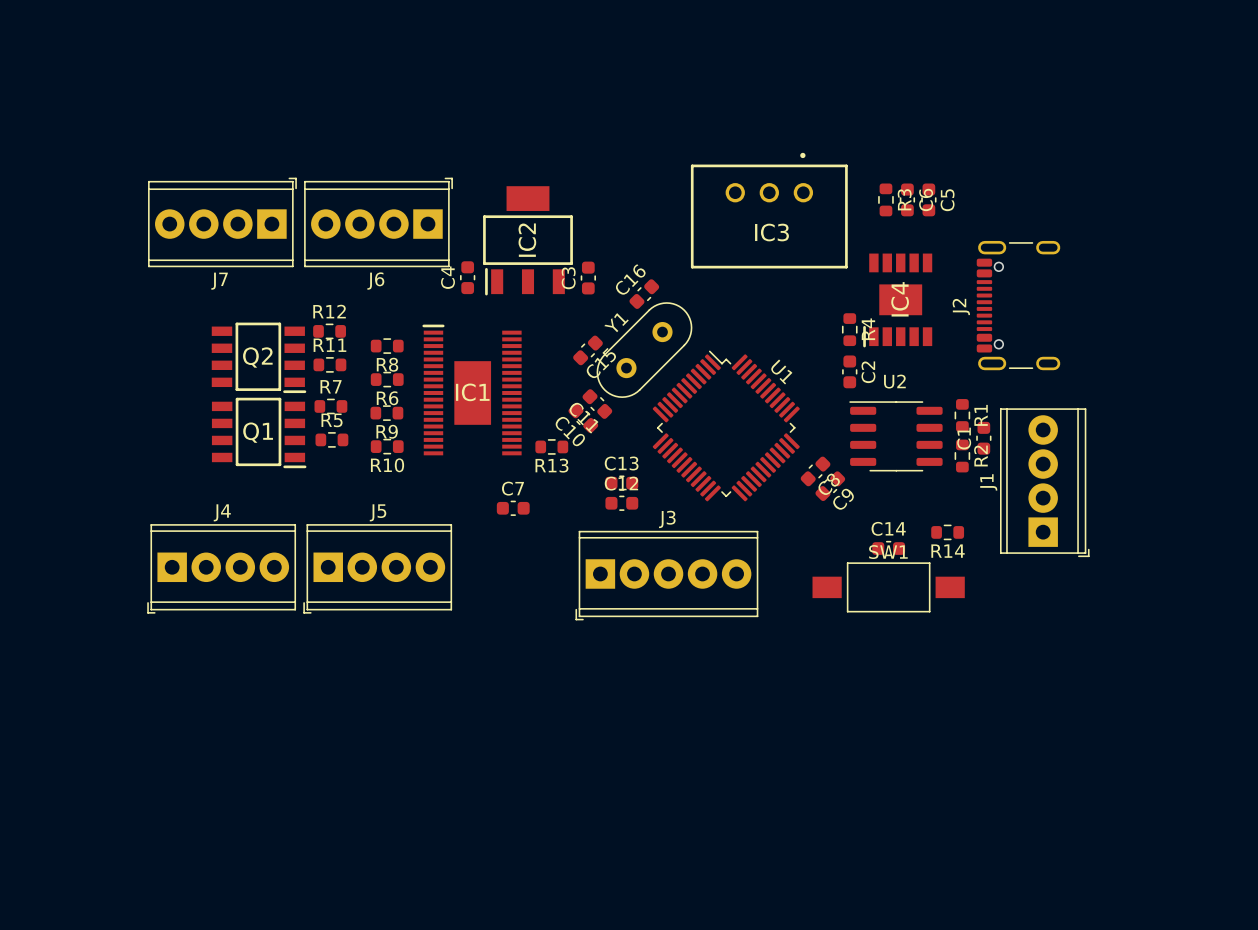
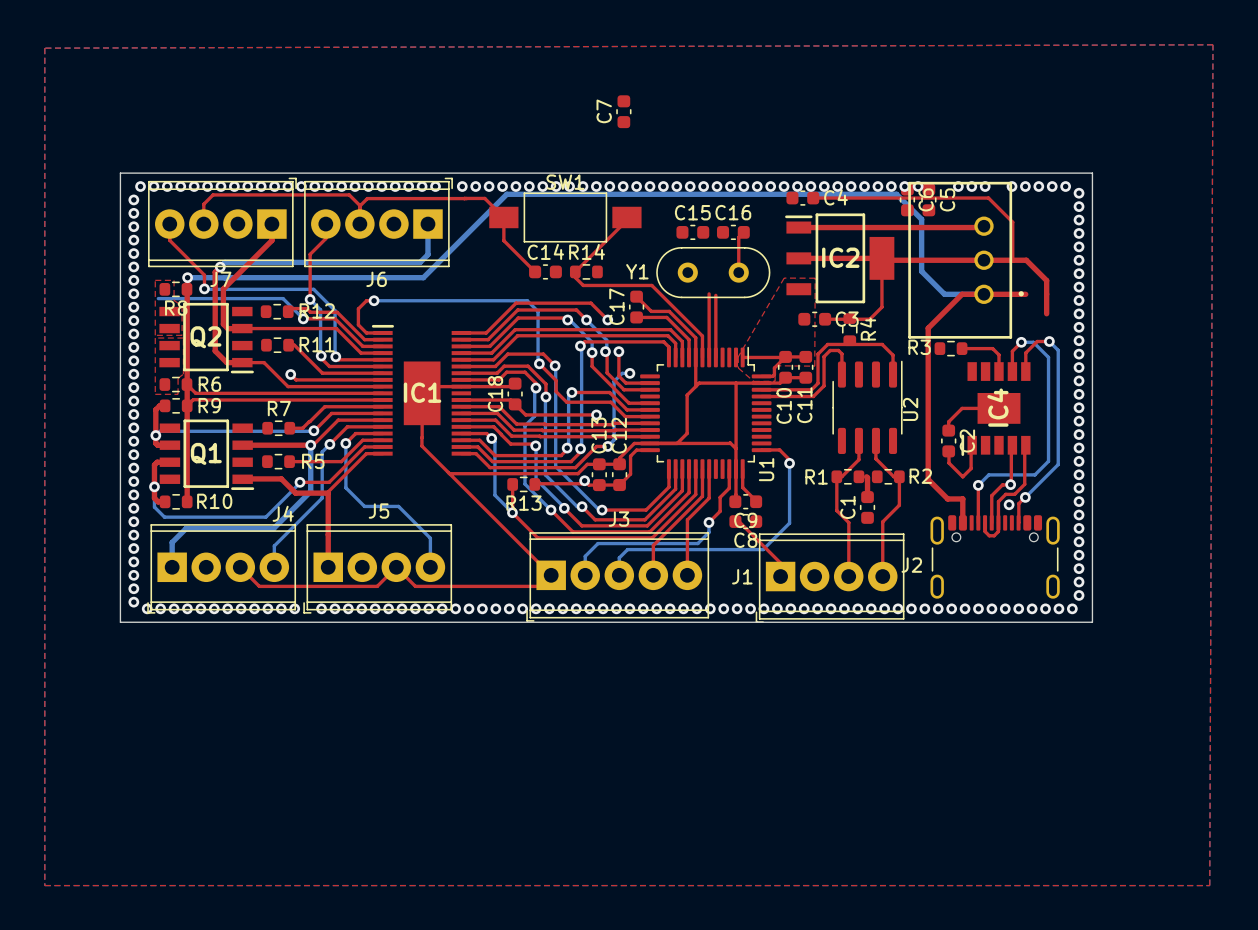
top zone outline: none -> (1212, 44) (1209, 885) (44, 885) (44, 48) (1212, 44)
board edge: none -> (120, 173) (1092, 173) (1092, 622) (120, 622) (120, 173)
via: none -> (140, 186)
via: none -> (153, 186)
via: none -> (167, 186)
via: none -> (180, 186)
via: none -> (194, 186)
via: none -> (207, 186)
via: none -> (220, 186)
via: none -> (234, 186)
via: none -> (247, 186)
via: none -> (261, 186)
via: none -> (274, 186)
via: none -> (288, 186)
via: none -> (301, 186)
via: none -> (314, 186)
via: none -> (328, 186)
via: none -> (341, 186)
via: none -> (355, 186)
via: none -> (368, 186)
via: none -> (381, 186)
via: none -> (395, 186)
via: none -> (408, 186)
via: none -> (422, 186)
via: none -> (435, 186)
via: none -> (462, 186)
via: none -> (475, 186)
via: none -> (489, 186)
via: none -> (502, 186)
via: none -> (515, 186)
via: none -> (529, 186)
via: none -> (542, 186)
via: none -> (556, 186)
via: none -> (569, 186)
via: none -> (582, 186)
via: none -> (596, 186)
via: none -> (609, 186)
via: none -> (623, 186)
via: none -> (636, 186)
via: none -> (650, 186)
via: none -> (663, 186)
via: none -> (676, 186)
via: none -> (690, 186)
via: none -> (703, 186)
via: none -> (717, 186)
via: none -> (730, 186)
via: none -> (743, 186)
via: none -> (757, 186)
via: none -> (770, 186)
via: none -> (784, 186)
via: none -> (797, 186)
via: none -> (810, 186)
via: none -> (824, 186)
via: none -> (837, 186)
via: none -> (851, 186)
via: none -> (864, 186)
via: none -> (877, 186)
via: none -> (891, 186)
via: none -> (904, 186)
via: none -> (918, 186)
via: none -> (958, 186)
via: none -> (971, 186)
via: none -> (985, 186)
via: none -> (1012, 186)
via: none -> (1025, 186)
via: none -> (1038, 186)
via: none -> (1052, 186)
via: none -> (1065, 186)
via: none -> (1079, 193)
top track: none -> (464, 198) (484, 198) (503, 217) (503, 240) (535, 271)
top track: none -> (466, 198) (367, 198) (359, 206)
top track: none -> (813, 198) (988, 198) (1012, 222) (1012, 260)
via: none -> (133, 199)
R3 rotation: 0° (885, 199) -> 90° clockwise (951, 348)
R3 position: (885, 199) -> (951, 348)
R3 name position: R3 (904, 199) -> R3 (919, 347)
via: none -> (1079, 206)
IC3: (769, 210) -> none
via: none -> (133, 213)
top track: none -> (626, 217) (626, 220) (575, 271) (575, 277) (583, 285) (651, 285) (702, 336) (702, 357)
via: none -> (1079, 220)
top track: none -> (169, 224) (169, 240) (204, 275) (204, 288)
top track: none -> (203, 224) (203, 204) (213, 194) (349, 194) (359, 205) (359, 224)
top track: none -> (271, 224) (271, 240) (223, 289) (223, 324) (227, 328) (236, 328)
top track: none -> (325, 224) (325, 238) (310, 254) (310, 299)
bottom track: none -> (427, 224) (427, 254) (420, 262) (225, 262) (220, 267)
via: none -> (133, 226)
top track: none -> (983, 226) (798, 227)
top track: none -> (743, 232) (738, 237) (738, 272)
via: none -> (1079, 233)
via: none -> (133, 240)
IC2 rotation: 0° (528, 240) -> 90° clockwise (839, 258)
IC2 position: (528, 240) -> (839, 258)
via: none -> (1079, 246)
via: none -> (133, 253)
top track: none -> (798, 258) (881, 258)
top track: none -> (881, 258) (881, 307) (869, 319) (825, 319)
top track: none -> (881, 258) (883, 260) (1026, 260) (1046, 280) (1046, 313)
part: none -> (966, 260)
via: none -> (1079, 260)
via: none -> (133, 266)
top track: none -> (220, 267) (215, 272) (215, 351) (226, 362) (264, 362) (288, 386) (382, 386)
via: none -> (220, 267)
via: none -> (1079, 273)
top track: none -> (187, 277) (187, 501)
bottom track: none -> (187, 277) (215, 277)
via: none -> (187, 277)
bottom track: none -> (215, 277) (224, 277)
bottom track: none -> (224, 277) (423, 277) (506, 194) (896, 194) (921, 219) (921, 271) (944, 294) (983, 294)
C4 name position: C4 (448, 277) -> C4 (836, 197)
C4 rotation: 0° (467, 277) -> 90° clockwise (802, 198)
C4 position: (467, 277) -> (802, 198)
C3 name position: C3 (568, 278) -> C3 (847, 319)
C3 rotation: 0° (588, 278) -> 90° clockwise (814, 319)
C3 position: (588, 278) -> (814, 319)
top zone outline: none -> (784, 278) (815, 278) (814, 366) (775, 365) (775, 381) (753, 381) (738, 368) (738, 356) (784, 278)
via: none -> (133, 280)
top zone outline: none -> (155, 280) (155, 335) (182, 335) (182, 305) (174, 300) (174, 280) (155, 280)
via: none -> (1079, 287)
bottom track: none -> (204, 288) (313, 289) (335, 310) (335, 356)
via: none -> (204, 288)
via: none -> (133, 293)
top track: none -> (709, 293) (709, 357)
C16 rotation: 0° (644, 294) -> 45° clockwise (733, 232)
C16 position: (644, 294) -> (733, 232)
top track: none -> (1025, 294) (962, 294) (928, 328) (928, 479) (947, 498) (962, 498) (962, 522)
top track: none -> (715, 295) (715, 357)
top track: none -> (636, 296) (651, 311) (669, 311) (695, 337) (695, 386)
bottom track: none -> (158, 298) (283, 298) (303, 318)
bottom track: none -> (310, 299) (320, 309) (321, 356)
via: none -> (310, 299)
top track: none -> (374, 300) (366, 300) (358, 308) (358, 324) (366, 332) (382, 332)
bottom track: none -> (374, 300) (527, 300) (538, 311) (539, 363)
via: none -> (374, 300)
IC4 position: (897, 300) -> (995, 409)
via: none -> (1079, 300)
J2 rotation: 0° (1018, 305) -> 90° clockwise (995, 556)
J2 position: (1018, 305) -> (995, 556)
via: none -> (133, 307)
C17: none -> (636, 307)
top track: none -> (288, 311) (291, 308) (306, 308) (310, 312) (337, 312) (364, 339) (382, 339)
R12 name position: R12 (329, 311) -> R12 (317, 310)
via: none -> (1079, 313)
top track: none -> (636, 317) (666, 317) (689, 339) (689, 357)
top track: none -> (303, 318) (335, 318) (362, 346) (382, 346)
via: none -> (303, 318)
top track: none -> (567, 319) (565, 318) (518, 318) (489, 346) (461, 346)
bottom track: none -> (567, 319) (592, 342) (592, 352)
via: none -> (567, 319)
top track: none -> (586, 319) (576, 310) (517, 310) (488, 339) (461, 339)
bottom track: none -> (586, 319) (606, 340) (605, 351)
via: none -> (586, 319)
top track: none -> (607, 319) (590, 303) (516, 303) (486, 332) (461, 332)
via: none -> (607, 319)
via: none -> (133, 320)
Y1 name position: Y1 (616, 322) -> Y1 (637, 271)
via: none -> (1079, 327)
top track: none -> (236, 328) (336, 328) (361, 353) (382, 353)
R12 position: (329, 331) -> (277, 311)
via: none -> (133, 334)
top zone outline: none -> (155, 338) (155, 394) (178, 394) (178, 378) (183, 374) (183, 338) (155, 338)
via: none -> (1079, 340)
top track: none -> (1049, 341) (1037, 341) (1025, 352) (1025, 371)
bottom track: none -> (1049, 341) (1058, 350) (1058, 464) (1025, 497)
via: none -> (1049, 341)
top track: none -> (1021, 342) (1012, 351) (1012, 371)
bottom track: none -> (1021, 342) (1033, 342) (1048, 357) (1048, 461) (1034, 474) (988, 474) (978, 485)
via: none -> (1021, 342)
top track: none -> (288, 345) (294, 345) (322, 373) (382, 373)
R11 name position: R11 (329, 345) -> R11 (317, 344)
R8 position: (387, 346) -> (175, 289)
top track: none -> (580, 346) (584, 341) (663, 341) (668, 347) (668, 357)
bottom track: none -> (580, 346) (580, 448)
via: none -> (580, 346)
via: none -> (133, 347)
top track: none -> (962, 348) (992, 348) (998, 354) (998, 371)
C15 rotation: 0° (587, 350) -> 45° clockwise (692, 232)
C15 position: (587, 350) -> (692, 232)
Y1 rotation: 0° (644, 350) -> 45° clockwise (713, 272)
Y1 position: (644, 350) -> (713, 272)
top track: none -> (605, 351) (607, 372) (624, 389) (650, 389)
via: none -> (605, 351)
top track: none -> (618, 351) (618, 376) (625, 383) (650, 383)
via: none -> (618, 351)
top track: none -> (592, 352) (592, 366) (628, 403) (650, 403)
via: none -> (592, 352)
top track: none -> (461, 353) (491, 353) (515, 329) (670, 329) (682, 341) (682, 357)
via: none -> (1079, 354)
top track: none -> (321, 356) (329, 366) (382, 366)
via: none -> (321, 356)
top track: none -> (335, 356) (338, 359) (382, 359)
via: none -> (335, 356)
top track: none -> (805, 356) (785, 356) (774, 368) (772, 376) (761, 376)
Q2 position: (259, 357) -> (206, 338)
top track: none -> (675, 357) (675, 343) (668, 335) (517, 335) (493, 359) (461, 359)
top track: none -> (742, 357) (785, 357)
via: none -> (133, 360)
top track: none -> (539, 363) (556, 380) (556, 391) (566, 402) (610, 402) (625, 416) (650, 416)
via: none -> (539, 363)
C15 name position: C15 (601, 363) -> C15 (692, 212)
R11 position: (329, 364) -> (277, 345)
top track: none -> (555, 365) (543, 354) (507, 354) (495, 366) (461, 366)
bottom track: none -> (555, 365) (555, 466) (599, 510) (602, 510)
via: none -> (555, 365)
top track: none -> (841, 365) (841, 353) (838, 350) (830, 350) (824, 356) (824, 385) (813, 396) (761, 396)
top track: none -> (893, 365) (893, 355) (882, 344) (827, 344) (818, 354) (818, 383) (811, 389) (761, 389)
via: none -> (1079, 367)
U1 name position: U1 (781, 371) -> U1 (766, 469)
C2 position: (849, 371) -> (948, 440)
top track: none -> (461, 373) (497, 373) (504, 366) (528, 366) (545, 384) (545, 397)
bottom track: none -> (629, 373) (622, 373) (614, 381) (614, 440) (607, 446)
via: none -> (629, 373)
via: none -> (133, 374)
top track: none -> (290, 374) (296, 379) (382, 379)
via: none -> (290, 374)
top track: none -> (805, 377) (785, 377) (780, 383) (699, 383) (687, 395) (687, 433) (677, 443)
R6 position: (387, 379) -> (175, 384)
top track: none -> (461, 379) (499, 379) (506, 372) (524, 372) (536, 383) (536, 388)
via: none -> (1079, 380)
top track: none -> (515, 383) (512, 386) (428, 386) (422, 393) (421, 446) (551, 575) (540, 586) (415, 586) (396, 567) (377, 586) (259, 586) (240, 567)
top track: none -> (736, 383) (736, 448)
top track: none -> (186, 384) (195, 393) (382, 393)
via: none -> (133, 387)
bottom track: none -> (536, 388) (534, 416) (524, 425) (524, 484) (550, 510)
via: none -> (536, 388)
IC1 position: (472, 389) -> (421, 390)
top track: none -> (571, 392) (609, 392) (627, 409) (650, 409)
bottom track: none -> (571, 392) (568, 395) (567, 448)
via: none -> (571, 392)
C18: none -> (515, 393)
via: none -> (1079, 394)
bottom track: none -> (545, 397) (545, 474) (577, 506) (582, 506)
via: none -> (545, 397)
R6 name position: R6 (387, 398) -> R6 (209, 384)
top track: none -> (382, 400) (193, 399) (187, 405)
top track: none -> (461, 400) (510, 400) (525, 414) (596, 414)
via: none -> (133, 401)
C11 rotation: 0° (597, 404) -> 45° clockwise (805, 367)
C11 position: (597, 404) -> (805, 367)
top track: none -> (165, 405) (159, 405) (155, 409) (155, 443) (157, 445) (169, 445)
R7 position: (330, 406) -> (278, 428)
top track: none -> (382, 406) (324, 406) (302, 428) (289, 428)
top track: none -> (461, 406) (499, 406) (516, 424) (650, 423)
via: none -> (1079, 407)
top track: none -> (382, 413) (331, 413) (313, 430)
R9 position: (386, 413) -> (176, 405)
top track: none -> (461, 413) (497, 413) (514, 430) (650, 430)
via: none -> (133, 414)
via: none -> (596, 414)
R1 rotation: 0° (962, 415) -> 90° clockwise (888, 476)
R1 position: (962, 415) -> (888, 476)
R1 name position: R1 (981, 415) -> R1 (816, 476)
top track: none -> (997, 416) (989, 408) (962, 408) (948, 421) (948, 430)
C10 rotation: 0° (583, 418) -> 45° clockwise (785, 367)
C10 position: (583, 418) -> (785, 367)
C11 name position: C11 (584, 418) -> C11 (804, 405)
R5 name position: R5 (332, 420) -> R5 (313, 461)
top track: none -> (382, 420) (338, 420) (313, 445) (242, 445)
top track: none -> (461, 420) (495, 420) (511, 436) (650, 436)
via: none -> (1079, 421)
U1 rotation: 0° (726, 425) -> 45° clockwise (705, 412)
top track: none -> (382, 426) (347, 426) (329, 444)
top track: none -> (461, 426) (493, 426) (510, 444) (533, 444) (535, 445)
via: none -> (133, 427)
bottom track: none -> (313, 430) (159, 431) (155, 435)
via: none -> (313, 430)
R9 name position: R9 (387, 431) -> R9 (209, 405)
C10 name position: C10 (570, 431) -> C10 (784, 405)
top track: none -> (858, 431) (858, 459) (841, 476) (836, 476) (836, 510) (848, 522) (848, 576)
Q1 position: (259, 432) -> (206, 454)
top track: none -> (382, 433) (355, 433) (345, 443)
top track: none -> (461, 433) (486, 433) (491, 438)
via: none -> (1079, 434)
via: none -> (155, 435)
U2 rotation: 0° (895, 436) -> 90° clockwise (867, 407)
bottom track: none -> (491, 438) (494, 441) (494, 495) (512, 512)
via: none -> (491, 438)
C1 position: (983, 438) -> (867, 507)
R5 position: (331, 439) -> (278, 461)
top track: none -> (382, 440) (362, 440) (341, 461) (289, 461)
top track: none -> (461, 440) (479, 440) (495, 455) (561, 455) (567, 448)
via: none -> (133, 441)
bottom track: none -> (345, 443) (345, 487) (364, 506) (398, 506) (430, 538) (430, 567)
via: none -> (345, 443)
bottom track: none -> (329, 444) (322, 452) (322, 498) (274, 545) (274, 567)
via: none -> (329, 444)
via: none -> (310, 445)
bottom track: none -> (535, 445) (536, 479) (564, 508)
via: none -> (535, 445)
top track: none -> (1025, 445) (1024, 484) (1014, 494) (1005, 494) (998, 501) (998, 531) (994, 535) (989, 535) (985, 531) (985, 522)
bottom track: none -> (312, 446) (310, 445) (310, 491) (273, 528) (186, 528) (172, 542) (172, 567)
top track: none -> (382, 446) (364, 446) (329, 482) (299, 482)
R10 position: (387, 446) -> (176, 501)
top track: none -> (461, 446) (477, 446) (492, 461) (571, 461) (580, 452) (580, 448)
R13 position: (551, 446) -> (523, 484)
top track: none -> (607, 446) (596, 446) (575, 467) (490, 467) (476, 453) (461, 453)
via: none -> (607, 446)
via: none -> (1079, 447)
via: none -> (567, 448)
via: none -> (580, 448)
top track: none -> (761, 449) (779, 449) (789, 459) (789, 463)
top track: none -> (875, 449) (875, 458) (893, 476) (899, 476) (899, 505) (882, 521) (882, 576)
top track: none -> (650, 450) (636, 450) (630, 456) (630, 474) (619, 485) (588, 485) (584, 480) (581, 483) (538, 483)
top track: none -> (382, 453) (366, 453) (328, 491) (328, 534)
top track: none -> (971, 453) (971, 468) (962, 476) (948, 463) (948, 457)
top track: none -> (1011, 453) (1011, 483) (1002, 484) (991, 495) (991, 522)
via: none -> (133, 454)
R2 rotation: 0° (962, 456) -> 90° clockwise (847, 476)
R2 position: (962, 456) -> (847, 476)
R2 name position: R2 (980, 456) -> R2 (920, 476)
via: none -> (1079, 461)
top track: none -> (169, 462) (157, 462) (154, 464) (154, 498) (158, 501) (165, 501)
bottom track: none -> (789, 463) (789, 523) (763, 549) (627, 549) (619, 557) (619, 575)
via: none -> (789, 463)
R10 name position: R10 (387, 465) -> R10 (214, 501)
via: none -> (133, 468)
top track: none -> (668, 469) (668, 487) (646, 510) (602, 510)
top track: none -> (675, 469) (675, 489) (644, 519) (595, 519) (582, 506)
top track: none -> (682, 469) (682, 490) (647, 525) (581, 525) (564, 508)
top track: none -> (689, 469) (689, 492) (649, 531) (572, 531) (551, 510)
top track: none -> (695, 469) (695, 494) (652, 537) (537, 537) (512, 512)
top track: none -> (702, 469) (702, 496) (653, 545) (653, 575)
top track: none -> (709, 469) (709, 498) (687, 519) (687, 575)
top track: none -> (729, 469) (729, 488) (720, 497) (720, 511) (709, 522)
top track: none -> (742, 469) (742, 487) (756, 501)
C8 rotation: 0° (815, 471) -> 45° clockwise (745, 521)
C8 position: (815, 471) -> (745, 521)
top track: none -> (449, 473) (577, 473) (587, 464) (619, 464) (619, 458) (634, 443) (730, 442) (735, 448) (735, 495)
via: none -> (1079, 474)
top track: none -> (866, 476) (867, 497)
top track: none -> (242, 479) (281, 478) (295, 493) (328, 493) (328, 567)
via: none -> (584, 480)
via: none -> (133, 481)
bottom track: none -> (299, 482) (265, 517) (164, 517) (154, 507) (154, 486)
via: none -> (299, 482)
J1 name position: J1 (988, 482) -> J1 (742, 576)
J1 rotation: 0° (1044, 482) -> 90° clockwise (830, 578)
J1 position: (1044, 482) -> (830, 578)
C13 rotation: 0° (621, 483) -> 90° clockwise (599, 474)
C13 position: (621, 483) -> (599, 474)
top track: none -> (512, 484) (512, 512)
via: none -> (1010, 484)
top track: none -> (978, 485) (978, 522)
via: none -> (978, 485)
via: none -> (154, 486)
C9 rotation: 0° (830, 486) -> 45° clockwise (745, 501)
C9 position: (830, 486) -> (745, 501)
C7 name position: C7 (512, 488) -> C7 (604, 111)
via: none -> (1079, 488)
via: none -> (133, 494)
top track: none -> (1025, 497) (1018, 503) (1018, 522)
via: none -> (1025, 497)
via: none -> (1079, 501)
C12 rotation: 0° (621, 503) -> 90° clockwise (619, 474)
C12 position: (621, 503) -> (619, 474)
via: none -> (1009, 504)
via: none -> (582, 506)
via: none -> (133, 508)
C7 rotation: 0° (513, 508) -> 90° clockwise (623, 111)
C7 position: (513, 508) -> (623, 111)
via: none -> (564, 508)
via: none -> (551, 510)
via: none -> (602, 510)
J4 name position: J4 (222, 512) -> J4 (283, 513)
via: none -> (512, 512)
via: none -> (1079, 514)
via: none -> (133, 521)
top track: none -> (735, 521) (739, 521) (780, 563) (780, 576)
bottom track: none -> (709, 522) (709, 532) (697, 543) (597, 543) (585, 556) (585, 575)
via: none -> (709, 522)
via: none -> (1079, 528)
R14 position: (947, 532) -> (586, 271)
via: none -> (133, 535)
via: none -> (1079, 541)
via: none -> (133, 548)
C14 position: (888, 548) -> (545, 271)
R14 name position: R14 (948, 551) -> R14 (587, 251)
via: none -> (1079, 555)
via: none -> (133, 561)
via: none -> (1079, 568)
via: none -> (133, 575)
J3 position: (666, 575) -> (617, 576)
via: none -> (1079, 582)
SW1 position: (888, 587) -> (565, 217)
via: none -> (133, 588)
via: none -> (1079, 595)
via: none -> (133, 602)
via: none -> (147, 608)
via: none -> (160, 608)
via: none -> (174, 608)
via: none -> (187, 608)
via: none -> (200, 608)
via: none -> (214, 608)
via: none -> (227, 608)
via: none -> (241, 608)
via: none -> (254, 608)
via: none -> (267, 608)
via: none -> (281, 608)
via: none -> (294, 608)
via: none -> (321, 608)
via: none -> (334, 608)
via: none -> (348, 608)
via: none -> (361, 608)
via: none -> (375, 608)
via: none -> (388, 608)
via: none -> (401, 608)
via: none -> (415, 608)
via: none -> (428, 608)
via: none -> (442, 608)
via: none -> (455, 608)
via: none -> (469, 608)
via: none -> (482, 608)
via: none -> (495, 608)
via: none -> (509, 608)
via: none -> (522, 608)
via: none -> (536, 608)
via: none -> (549, 608)
via: none -> (562, 608)
via: none -> (576, 608)
via: none -> (589, 608)
via: none -> (603, 608)
via: none -> (616, 608)
via: none -> (629, 608)
via: none -> (643, 608)
via: none -> (656, 608)
via: none -> (670, 608)
via: none -> (683, 608)
via: none -> (696, 608)
via: none -> (710, 608)
via: none -> (723, 608)
via: none -> (737, 608)
via: none -> (750, 608)
via: none -> (763, 608)
via: none -> (777, 608)
via: none -> (790, 608)
via: none -> (804, 608)
via: none -> (817, 608)
via: none -> (831, 608)
via: none -> (844, 608)
via: none -> (857, 608)
via: none -> (871, 608)
via: none -> (884, 608)
via: none -> (898, 608)
via: none -> (911, 608)
via: none -> (924, 608)
via: none -> (938, 608)
via: none -> (951, 608)
via: none -> (965, 608)
via: none -> (978, 608)
via: none -> (991, 608)
via: none -> (1005, 608)
via: none -> (1018, 608)
via: none -> (1032, 608)
via: none -> (1045, 608)
via: none -> (1058, 608)
via: none -> (1072, 608)

